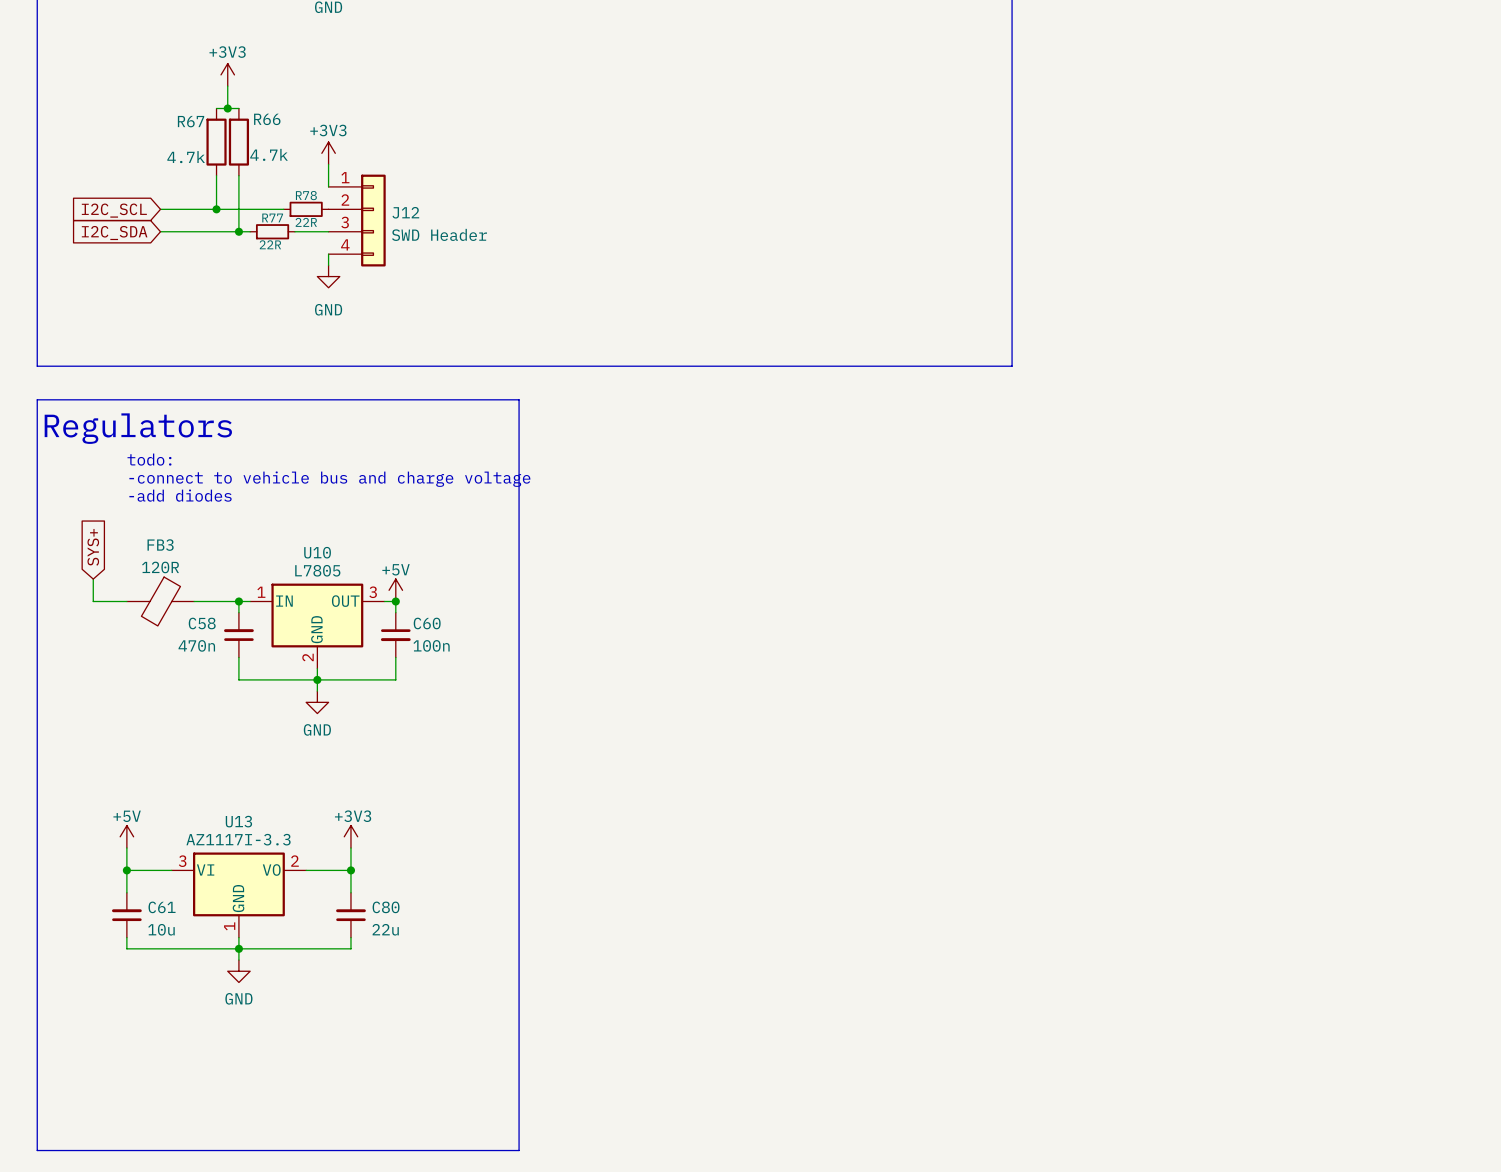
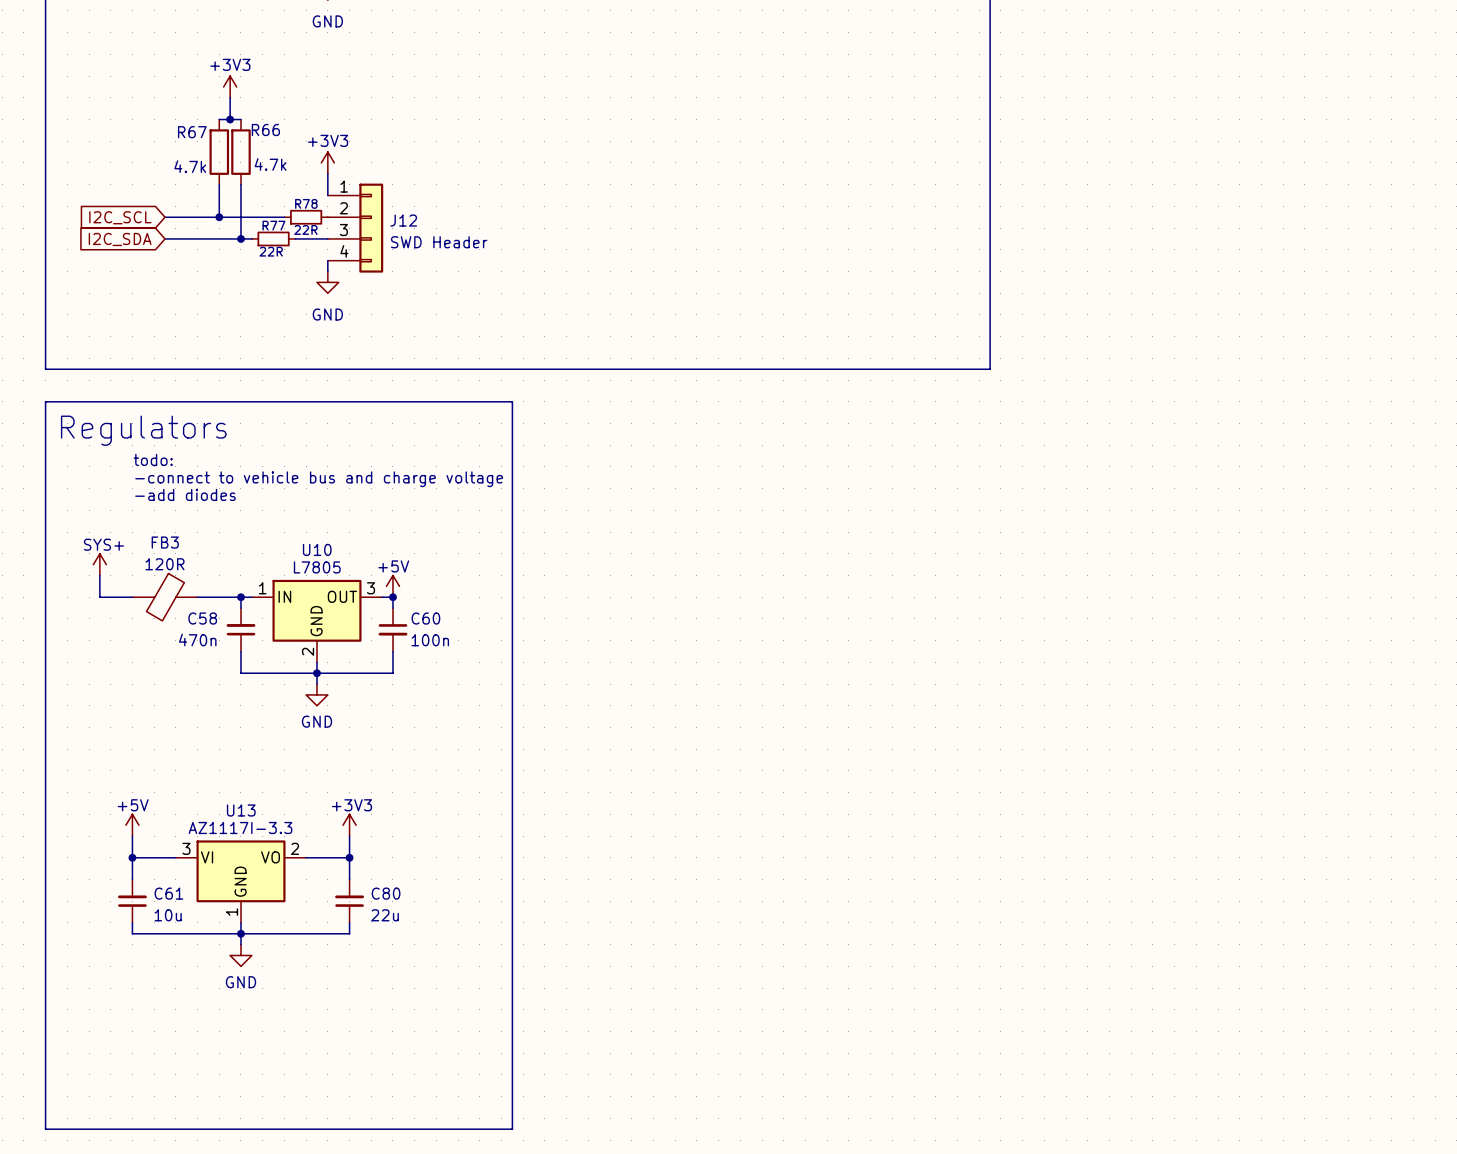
global label: SYS+ (93, 547) -> none
power symbol: none -> SYS+ (99, 564)

